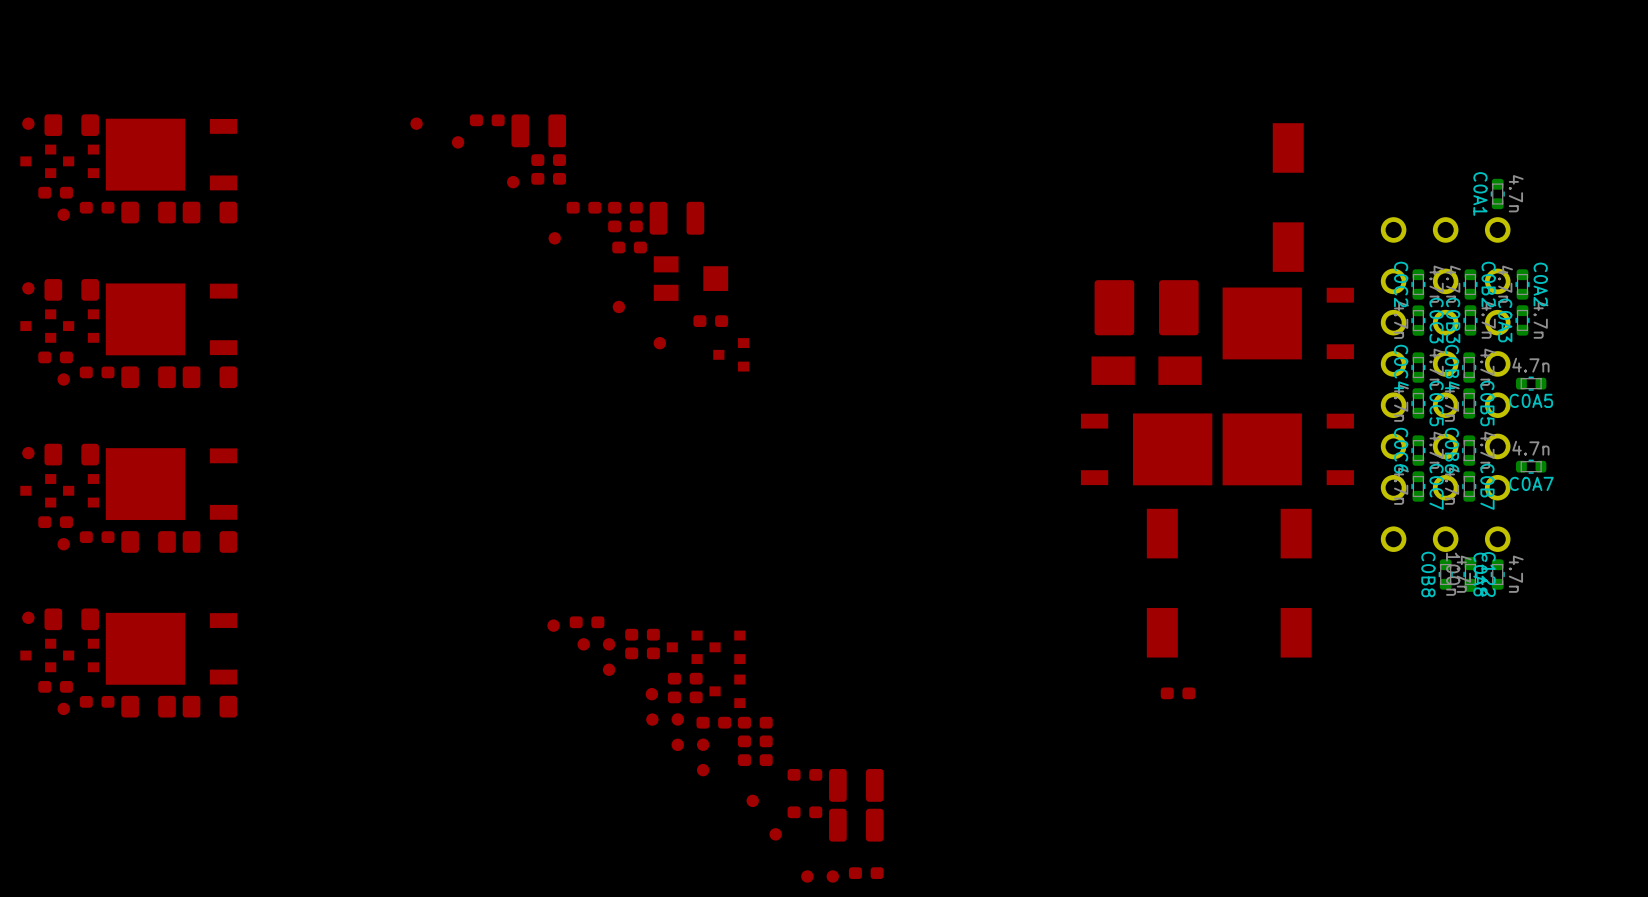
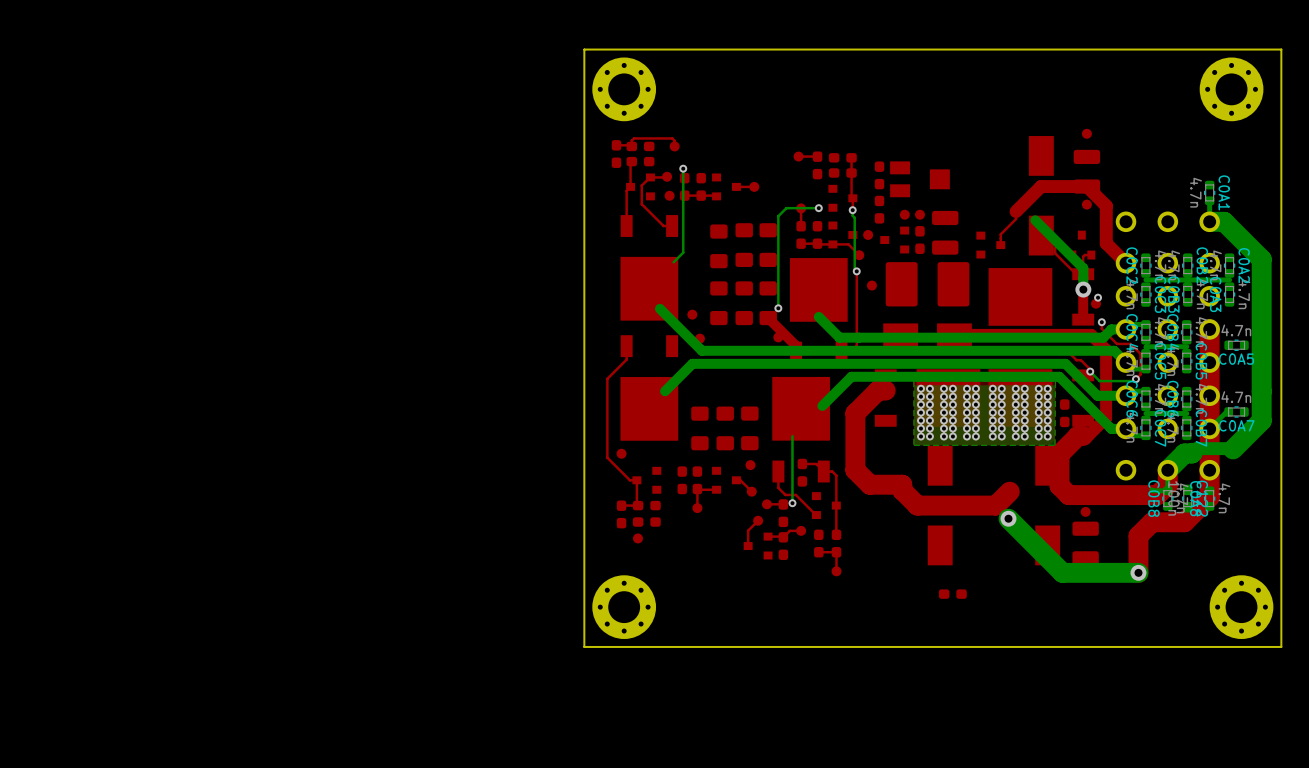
board edge: none -> (1281, 49) (584, 49) (584, 646) (1281, 646) (1281, 49)
part: none -> (624, 89)
part: none -> (1231, 89)
part: (487, 120) -> none
part: none -> (1086, 133)
part: (28, 123) -> none
part: (416, 123) -> none
part: (71, 125) -> none
part: (538, 130) -> none
top track: none -> (616, 145) (631, 146) (631, 140) (634, 138) (672, 138) (674, 140) (674, 146)
part: none -> (640, 146)
part: none -> (674, 146)
part: (458, 142) -> none
part: none -> (616, 154)
part: none -> (798, 156)
top track: none -> (817, 156) (798, 156)
part: none -> (842, 157)
top track: none -> (851, 157) (852, 210)
part: (171, 154) -> none
top track: none -> (631, 161) (630, 186) (626, 190) (626, 226)
part: none -> (640, 161)
part: none -> (817, 165)
part: (548, 160) -> none
part: (38, 161) -> none
part: (81, 161) -> none
bottom track: none -> (683, 168) (683, 252) (673, 262)
via: none -> (683, 168)
part: none -> (1086, 171)
part: none -> (842, 172)
part: none -> (879, 175)
top track: none -> (667, 176) (649, 177) (641, 185) (641, 204) (663, 226) (672, 226)
part: none -> (667, 176)
part: none -> (919, 179)
part: (548, 178) -> none
part: (513, 182) -> none
part: none -> (640, 186)
part: none -> (684, 186)
part: none -> (701, 186)
part: none -> (726, 186)
top track: none -> (754, 186) (736, 186)
part: none -> (754, 186)
part: (55, 192) -> none
C0A1 value position: 4.7n (1516, 193) -> 4.7n (1196, 192)
C0A1 name position: C0A1 (1480, 194) -> C0A1 (1224, 192)
part: none -> (669, 195)
top track: none -> (684, 195) (716, 196)
part: none -> (842, 198)
bottom track: none -> (1209, 200) (1209, 221) (1224, 221) (1261, 259) (1261, 420) (1233, 449) (1196, 448) (1192, 453) (1184, 453) (1167, 470) (1167, 490) (1151, 489)
part: (97, 207) -> none
part: (583, 207) -> none
part: (625, 207) -> none
part: none -> (1086, 204)
part: (148, 212) -> none
part: (209, 212) -> none
bottom track: none -> (818, 208) (786, 208) (778, 216) (778, 308)
via: none -> (818, 208)
top track: none -> (801, 208) (801, 226)
part: none -> (801, 208)
part: (63, 214) -> none
part: none -> (879, 209)
bottom track: none -> (852, 210) (854, 217) (854, 269) (856, 271)
via: none -> (852, 210)
part: (676, 218) -> none
part: none -> (904, 214)
part: none -> (919, 214)
part: (625, 226) -> none
bottom track: none -> (1035, 220) (1083, 268) (1083, 289)
part: (554, 238) -> none
part: none -> (945, 232)
part: none -> (801, 234)
part: none -> (817, 234)
part: none -> (842, 234)
part: none -> (868, 234)
part: (629, 247) -> none
part: none -> (894, 240)
part: none -> (919, 240)
top track: none -> (801, 243) (848, 244) (859, 255)
part: none -> (744, 245)
part: none -> (768, 245)
part: none -> (990, 245)
top track: none -> (1000, 245) (1000, 234) (1016, 219) (1016, 211) (1041, 186) (1086, 186) (1106, 205) (1106, 243) (1126, 263)
part: none -> (1081, 245)
part: none -> (718, 246)
top track: none -> (1055, 247) (1055, 253) (1076, 274) (1083, 274) (1083, 256) (1091, 255)
part: none -> (859, 255)
part: (690, 278) -> none
part: none -> (649, 267)
part: (28, 288) -> none
part: (71, 289) -> none
top track: none -> (856, 271) (856, 345) (849, 352) (841, 352)
via: none -> (856, 271)
bottom track: none -> (1229, 279) (1145, 279)
part: (618, 306) -> none
part: none -> (871, 285)
top track: none -> (1083, 289) (1083, 319)
via: none -> (1083, 289)
part: (171, 319) -> none
part: (710, 321) -> none
via: none -> (1098, 297)
part: (38, 326) -> none
part: (81, 326) -> none
part: none -> (718, 303)
part: none -> (744, 303)
part: none -> (768, 303)
part: none -> (1096, 303)
via: none -> (778, 308)
bottom track: none -> (659, 308) (701, 350) (1114, 350) (1132, 369) (1145, 369)
part: none -> (818, 310)
part: (659, 343) -> none
part: none -> (692, 314)
bottom track: none -> (818, 316) (839, 337) (1103, 337) (1111, 329) (1126, 329) (1130, 324) (1145, 324)
part: (731, 354) -> none
top track: none -> (1101, 322) (1101, 328) (1116, 343) (1130, 343) (1140, 353) (1140, 374) (1135, 379)
via: none -> (1101, 322)
part: (55, 357) -> none
top track: none -> (1209, 329) (1209, 497) (1184, 522) (1152, 522) (1138, 535) (1138, 572)
top track: none -> (954, 334) (1091, 334) (1106, 349) (1106, 418) (1088, 435) (1078, 435) (1059, 454) (1059, 485) (1068, 495) (1157, 495) (1167, 484) (1167, 470)
part: (97, 372) -> none
top track: none -> (778, 337) (778, 328) (768, 318) (796, 345) (796, 352)
part: none -> (778, 337)
part: none -> (699, 338)
part: (148, 377) -> none
part: (209, 377) -> none
part: (63, 379) -> none
top track: none -> (626, 346) (626, 359) (607, 378) (607, 457) (629, 480) (636, 480) (638, 505) (621, 505)
bottom track: none -> (1186, 346) (1145, 347)
top track: none -> (1069, 352) (1076, 360) (1080, 360) (1090, 371)
bottom track: none -> (1090, 371) (1099, 381) (1134, 381) (1135, 379)
via: none -> (1090, 371)
via: none -> (1135, 379)
bottom zone outline: none -> (1055, 381) (913, 381) (913, 445) (1055, 445) (1055, 381)
part: none -> (649, 387)
via: none -> (920, 388)
via: none -> (929, 388)
via: none -> (943, 388)
via: none -> (952, 388)
via: none -> (966, 388)
via: none -> (975, 388)
via: none -> (992, 388)
via: none -> (1001, 388)
via: none -> (1015, 388)
via: none -> (1024, 388)
via: none -> (1038, 388)
via: none -> (1047, 388)
top track: none -> (885, 390) (878, 390) (855, 413) (855, 470) (869, 484) (902, 484) (902, 490) (917, 505) (995, 505) (1009, 491)
bottom track: none -> (1145, 391) (1130, 391) (1126, 395) (1097, 395) (1065, 363) (692, 363) (665, 391)
via: none -> (920, 396)
via: none -> (929, 396)
via: none -> (943, 396)
via: none -> (952, 396)
via: none -> (966, 396)
via: none -> (975, 396)
via: none -> (992, 396)
via: none -> (1001, 396)
via: none -> (1015, 396)
via: none -> (1024, 396)
via: none -> (1038, 396)
via: none -> (1047, 396)
part: (28, 453) -> none
part: (71, 454) -> none
via: none -> (920, 404)
via: none -> (929, 404)
via: none -> (943, 404)
via: none -> (952, 404)
via: none -> (966, 404)
via: none -> (975, 404)
via: none -> (992, 404)
via: none -> (1001, 404)
via: none -> (1015, 404)
via: none -> (1024, 404)
via: none -> (1038, 404)
via: none -> (1047, 404)
bottom track: none -> (822, 405) (851, 376) (1059, 376) (1111, 428) (1126, 428) (1132, 435) (1145, 435)
bottom track: none -> (1226, 411) (1209, 428)
via: none -> (920, 412)
via: none -> (929, 412)
via: none -> (943, 412)
via: none -> (952, 412)
via: none -> (966, 412)
via: none -> (975, 412)
via: none -> (992, 412)
via: none -> (1001, 412)
via: none -> (1015, 412)
via: none -> (1024, 412)
via: none -> (1038, 412)
via: none -> (1047, 412)
part: none -> (1064, 413)
bottom track: none -> (1186, 413) (1145, 413)
via: none -> (920, 420)
via: none -> (929, 420)
via: none -> (943, 420)
via: none -> (952, 420)
via: none -> (966, 420)
via: none -> (975, 420)
via: none -> (992, 420)
via: none -> (1001, 420)
via: none -> (1015, 420)
via: none -> (1024, 420)
via: none -> (1038, 420)
via: none -> (1047, 420)
part: (171, 484) -> none
part: none -> (699, 428)
part: none -> (725, 428)
part: none -> (749, 428)
via: none -> (920, 428)
via: none -> (929, 428)
via: none -> (943, 428)
via: none -> (952, 428)
via: none -> (966, 428)
via: none -> (975, 428)
via: none -> (992, 428)
via: none -> (1001, 428)
via: none -> (1015, 428)
via: none -> (1024, 428)
via: none -> (1038, 428)
via: none -> (1047, 428)
part: none -> (801, 429)
part: (38, 490) -> none
part: (81, 490) -> none
bottom track: none -> (792, 436) (792, 503)
via: none -> (920, 436)
via: none -> (929, 436)
via: none -> (943, 436)
via: none -> (952, 436)
via: none -> (966, 436)
via: none -> (975, 436)
via: none -> (992, 436)
via: none -> (1001, 436)
via: none -> (1015, 436)
via: none -> (1024, 436)
via: none -> (1038, 436)
via: none -> (1047, 436)
part: none -> (621, 453)
part: (55, 522) -> none
top track: none -> (802, 463) (816, 463) (823, 471) (832, 471) (836, 475) (836, 534)
part: none -> (750, 465)
part: (97, 537) -> none
top track: none -> (778, 471) (778, 487) (785, 494) (795, 494) (816, 515)
part: (148, 541) -> none
part: (209, 541) -> none
part: none -> (802, 472)
part: (63, 544) -> none
part: none -> (646, 480)
part: none -> (682, 480)
part: none -> (697, 480)
part: none -> (726, 480)
top track: none -> (736, 480) (740, 480) (751, 491)
top track: none -> (716, 489) (697, 489) (697, 508)
part: none -> (751, 491)
via: none -> (792, 503)
part: none -> (766, 504)
top track: none -> (783, 504) (766, 504)
part: none -> (646, 505)
part: none -> (826, 505)
part: none -> (697, 508)
part: none -> (1085, 511)
part: none -> (783, 513)
part: none -> (621, 514)
bottom track: none -> (1008, 518) (1062, 572) (1138, 572)
via: none -> (1008, 518)
top track: none -> (758, 520) (748, 530) (748, 546)
part: none -> (758, 520)
part: none -> (646, 522)
top track: none -> (801, 530) (789, 530) (783, 537) (768, 536)
part: none -> (801, 530)
part: (28, 617) -> none
part: (71, 619) -> none
part: (587, 622) -> none
part: none -> (637, 538)
part: (553, 625) -> none
part: none -> (818, 543)
part: none -> (836, 543)
part: none -> (1085, 543)
part: none -> (758, 546)
part: none -> (783, 546)
part: (642, 634) -> none
top track: none -> (818, 552) (836, 552) (836, 571)
part: (583, 644) -> none
part: (609, 644) -> none
part: (684, 647) -> none
part: (727, 647) -> none
part: (171, 648) -> none
part: (642, 653) -> none
part: (38, 655) -> none
part: (81, 655) -> none
part: none -> (836, 571)
via: none -> (1138, 572)
part: (609, 669) -> none
part: (685, 678) -> none
part: (55, 686) -> none
part: (727, 691) -> none
part: (651, 694) -> none
part: (685, 697) -> none
part: (97, 701) -> none
part: (148, 706) -> none
part: (209, 706) -> none
part: (63, 708) -> none
part: none -> (624, 607)
part: none -> (1241, 607)
part: (652, 719) -> none
part: (677, 719) -> none
part: (713, 722) -> none
part: (755, 722) -> none
part: (755, 741) -> none
part: (677, 744) -> none
part: (703, 744) -> none
part: (755, 760) -> none
part: (703, 770) -> none
part: (804, 774) -> none
part: (856, 785) -> none
part: (752, 800) -> none
part: (804, 812) -> none
part: (856, 825) -> none
part: (775, 834) -> none
part: (866, 873) -> none
part: (807, 876) -> none
part: (832, 876) -> none

